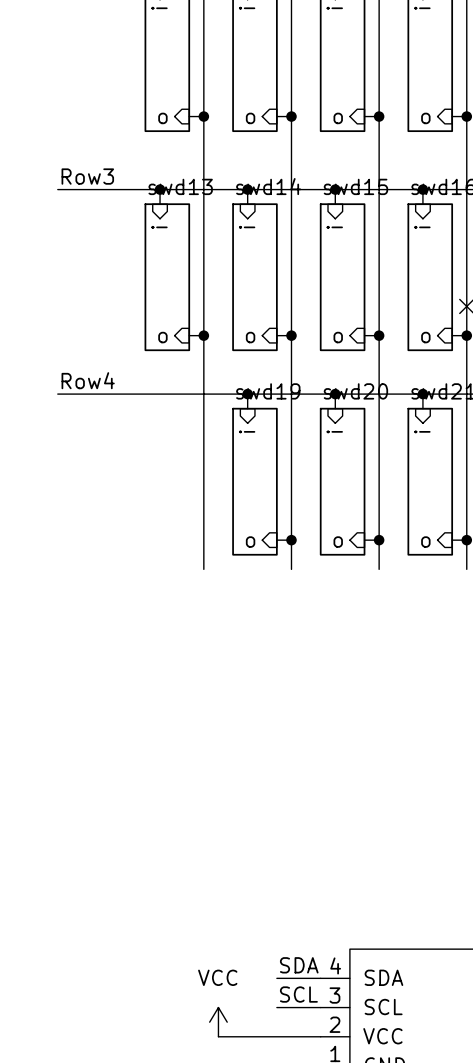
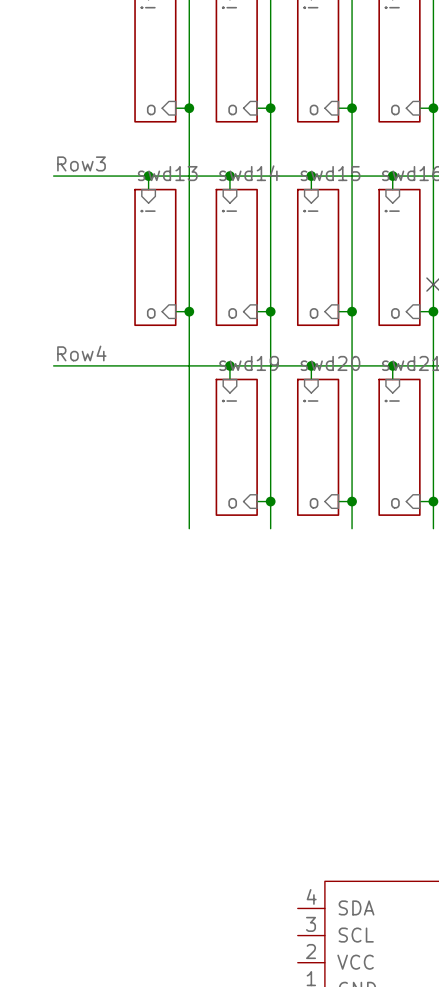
label: SDA (299, 965) -> none
wire: (276, 978) (320, 978) -> none
label: SCL (298, 994) -> none
wire: (276, 1007) (320, 1007) -> none
power symbol: VCC (218, 1022) -> none
wire: (218, 1036) (320, 1036) -> none

